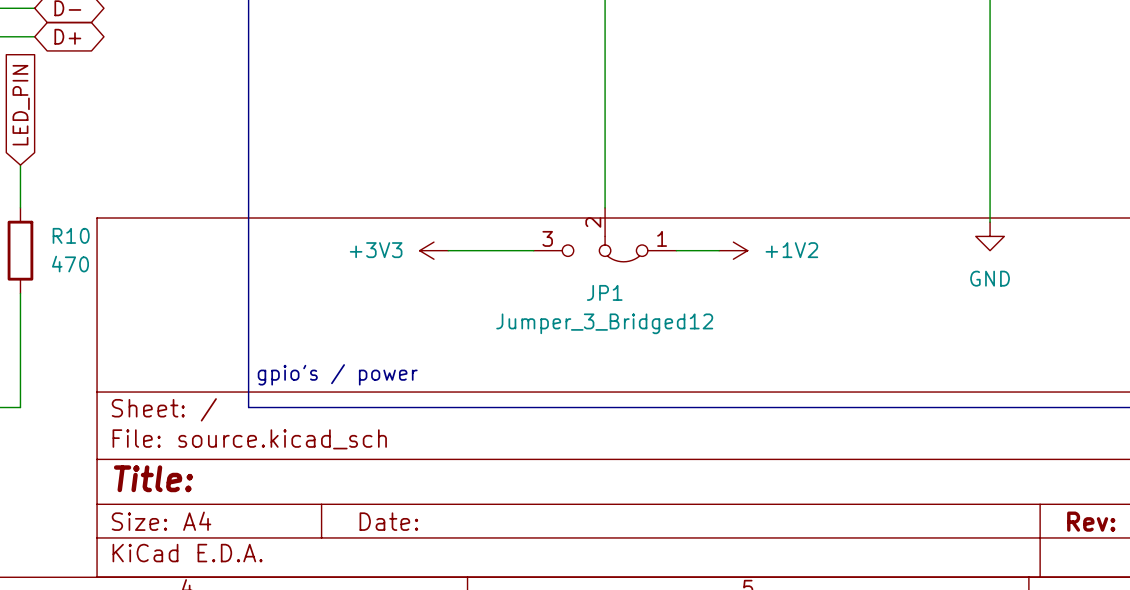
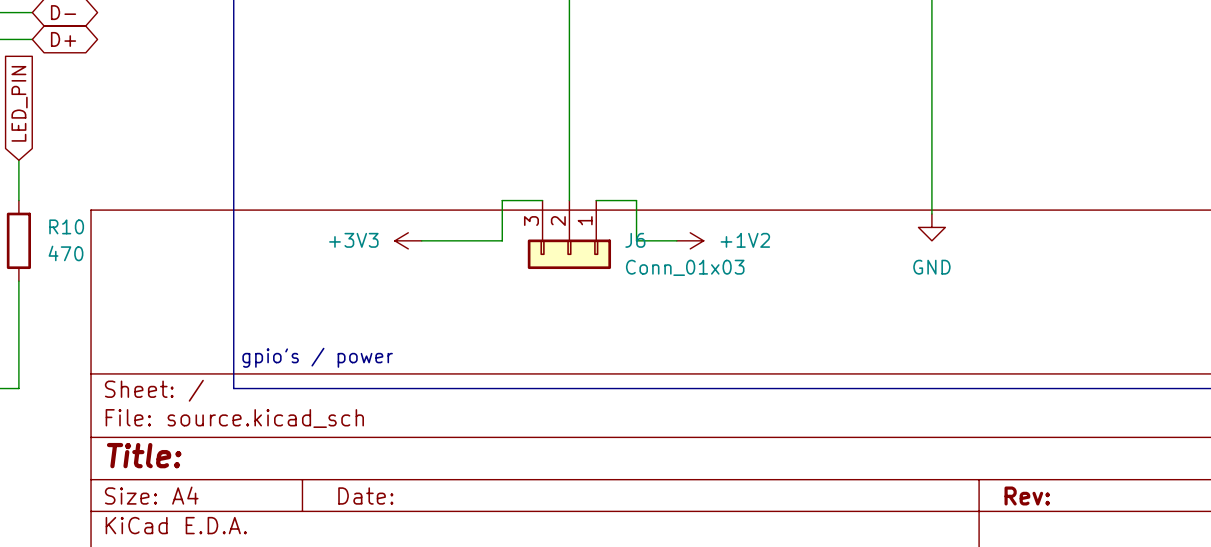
wire: none -> (542, 200) (502, 200) (502, 240)
wire: none -> (596, 200) (636, 200) (636, 240)
JP1: Jumper_3_Bridged12 (605, 234) -> none
J6: none -> Conn_01x03 (569, 234)

